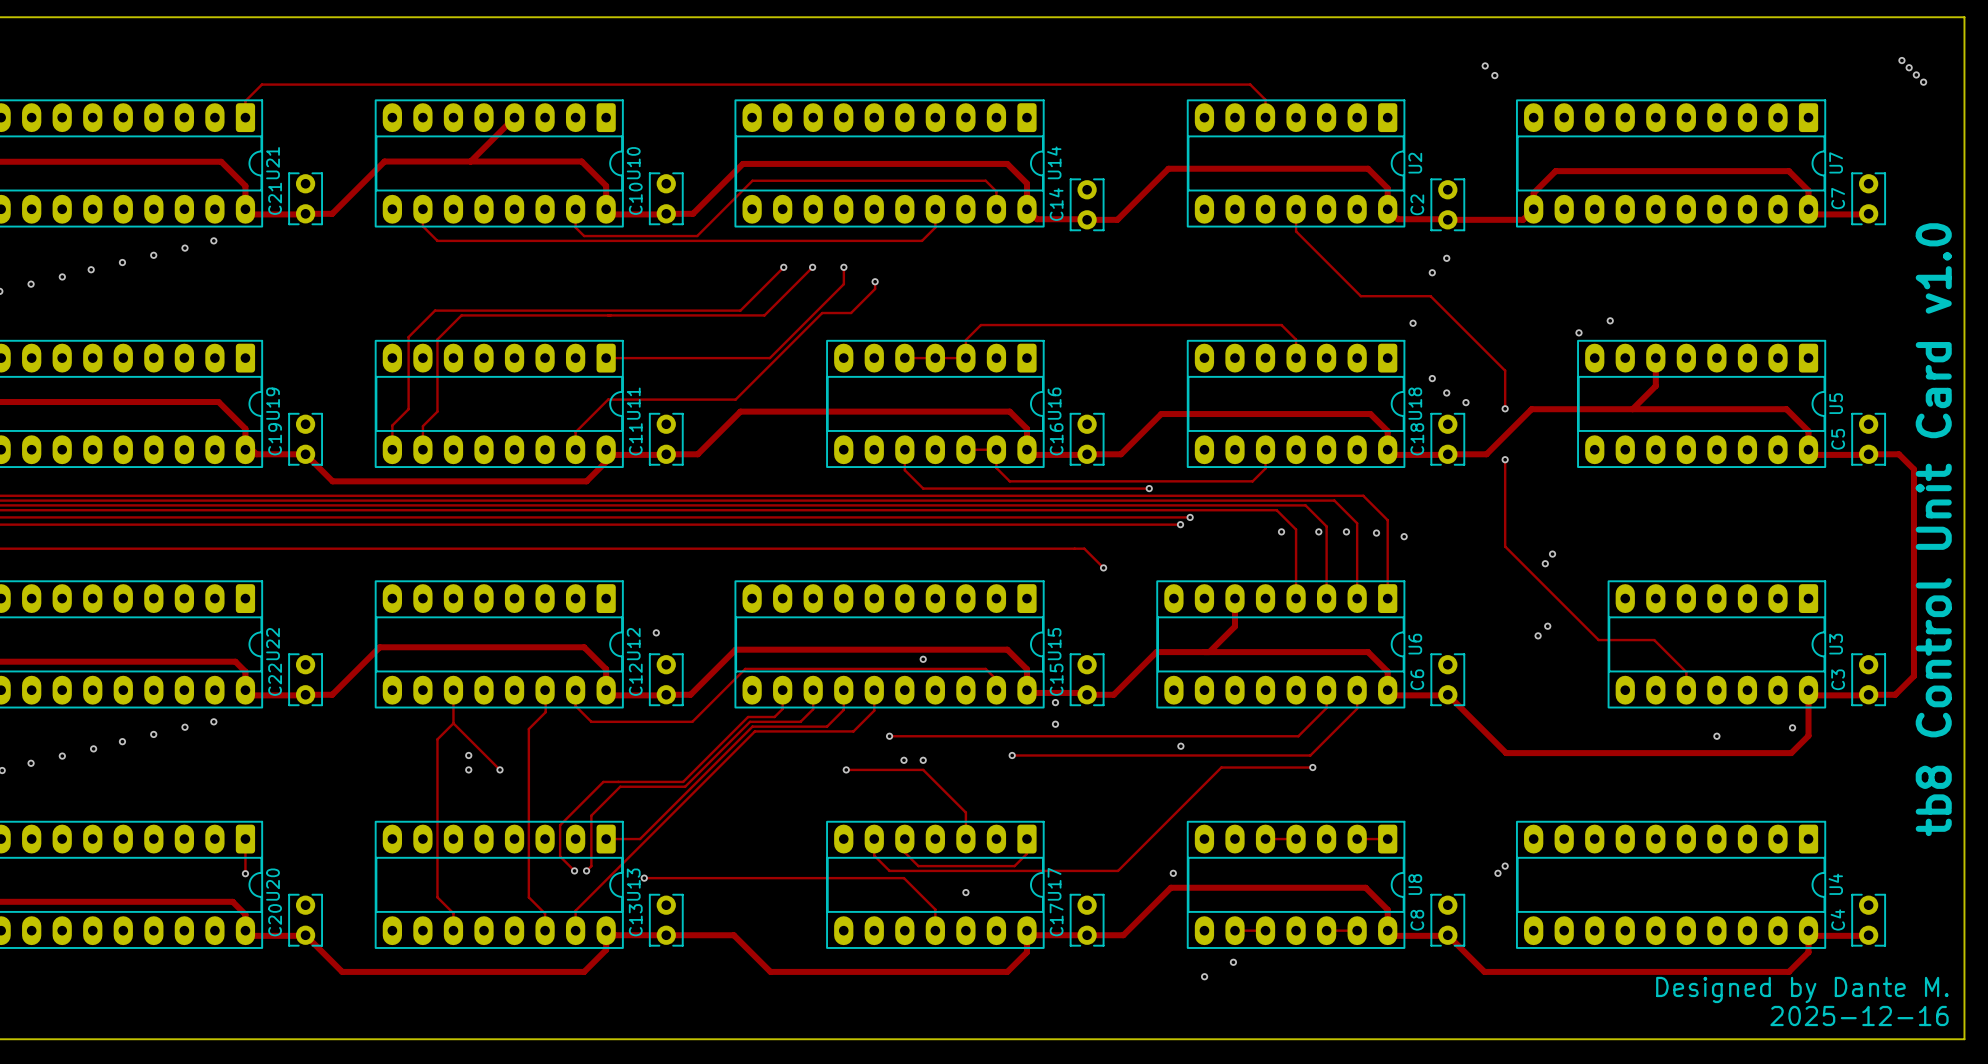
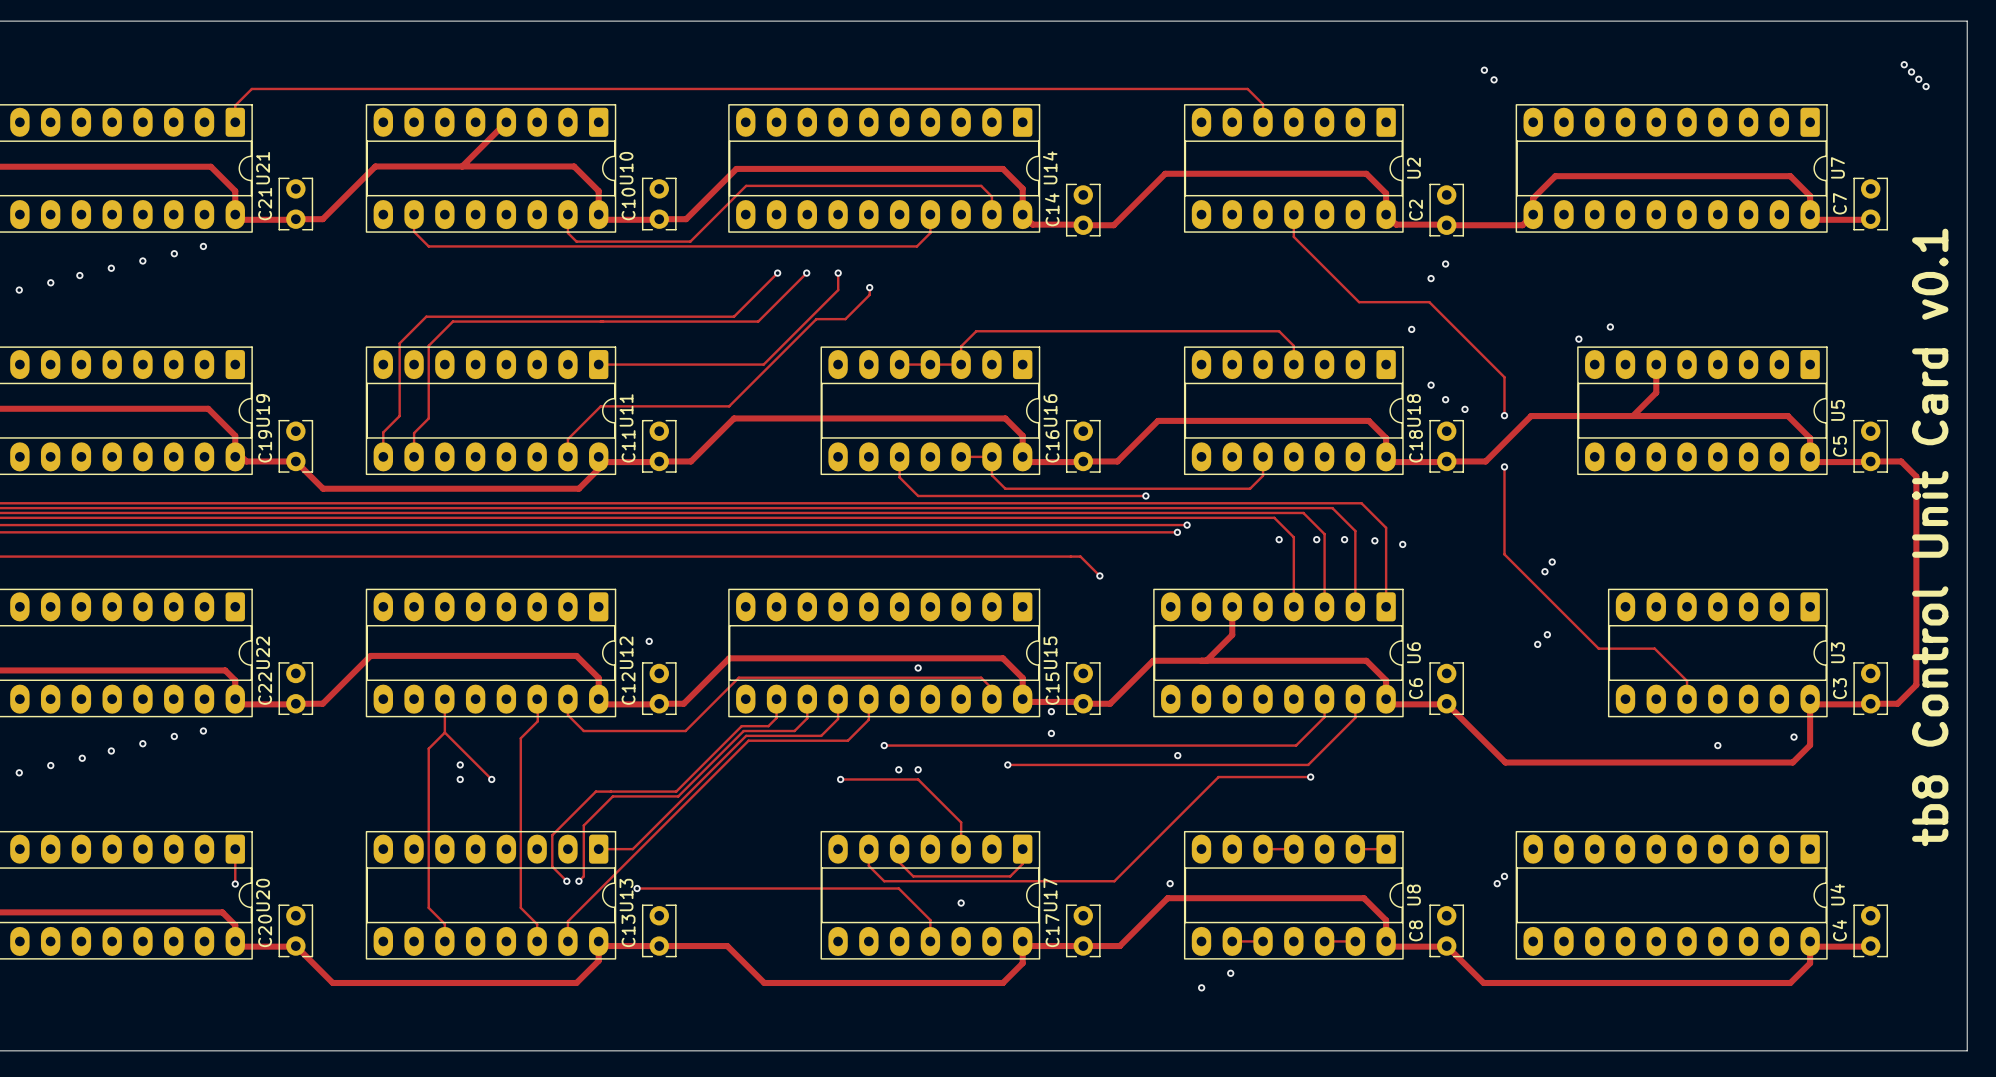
text: tb8 Control Unit Card v1.0 (1933, 529) -> tb8 Control Unit Card v0.1 (1930, 537)
text: Designed by Dante M. (1802, 989) -> none
text: 2025-12-16 (1859, 1016) -> none

